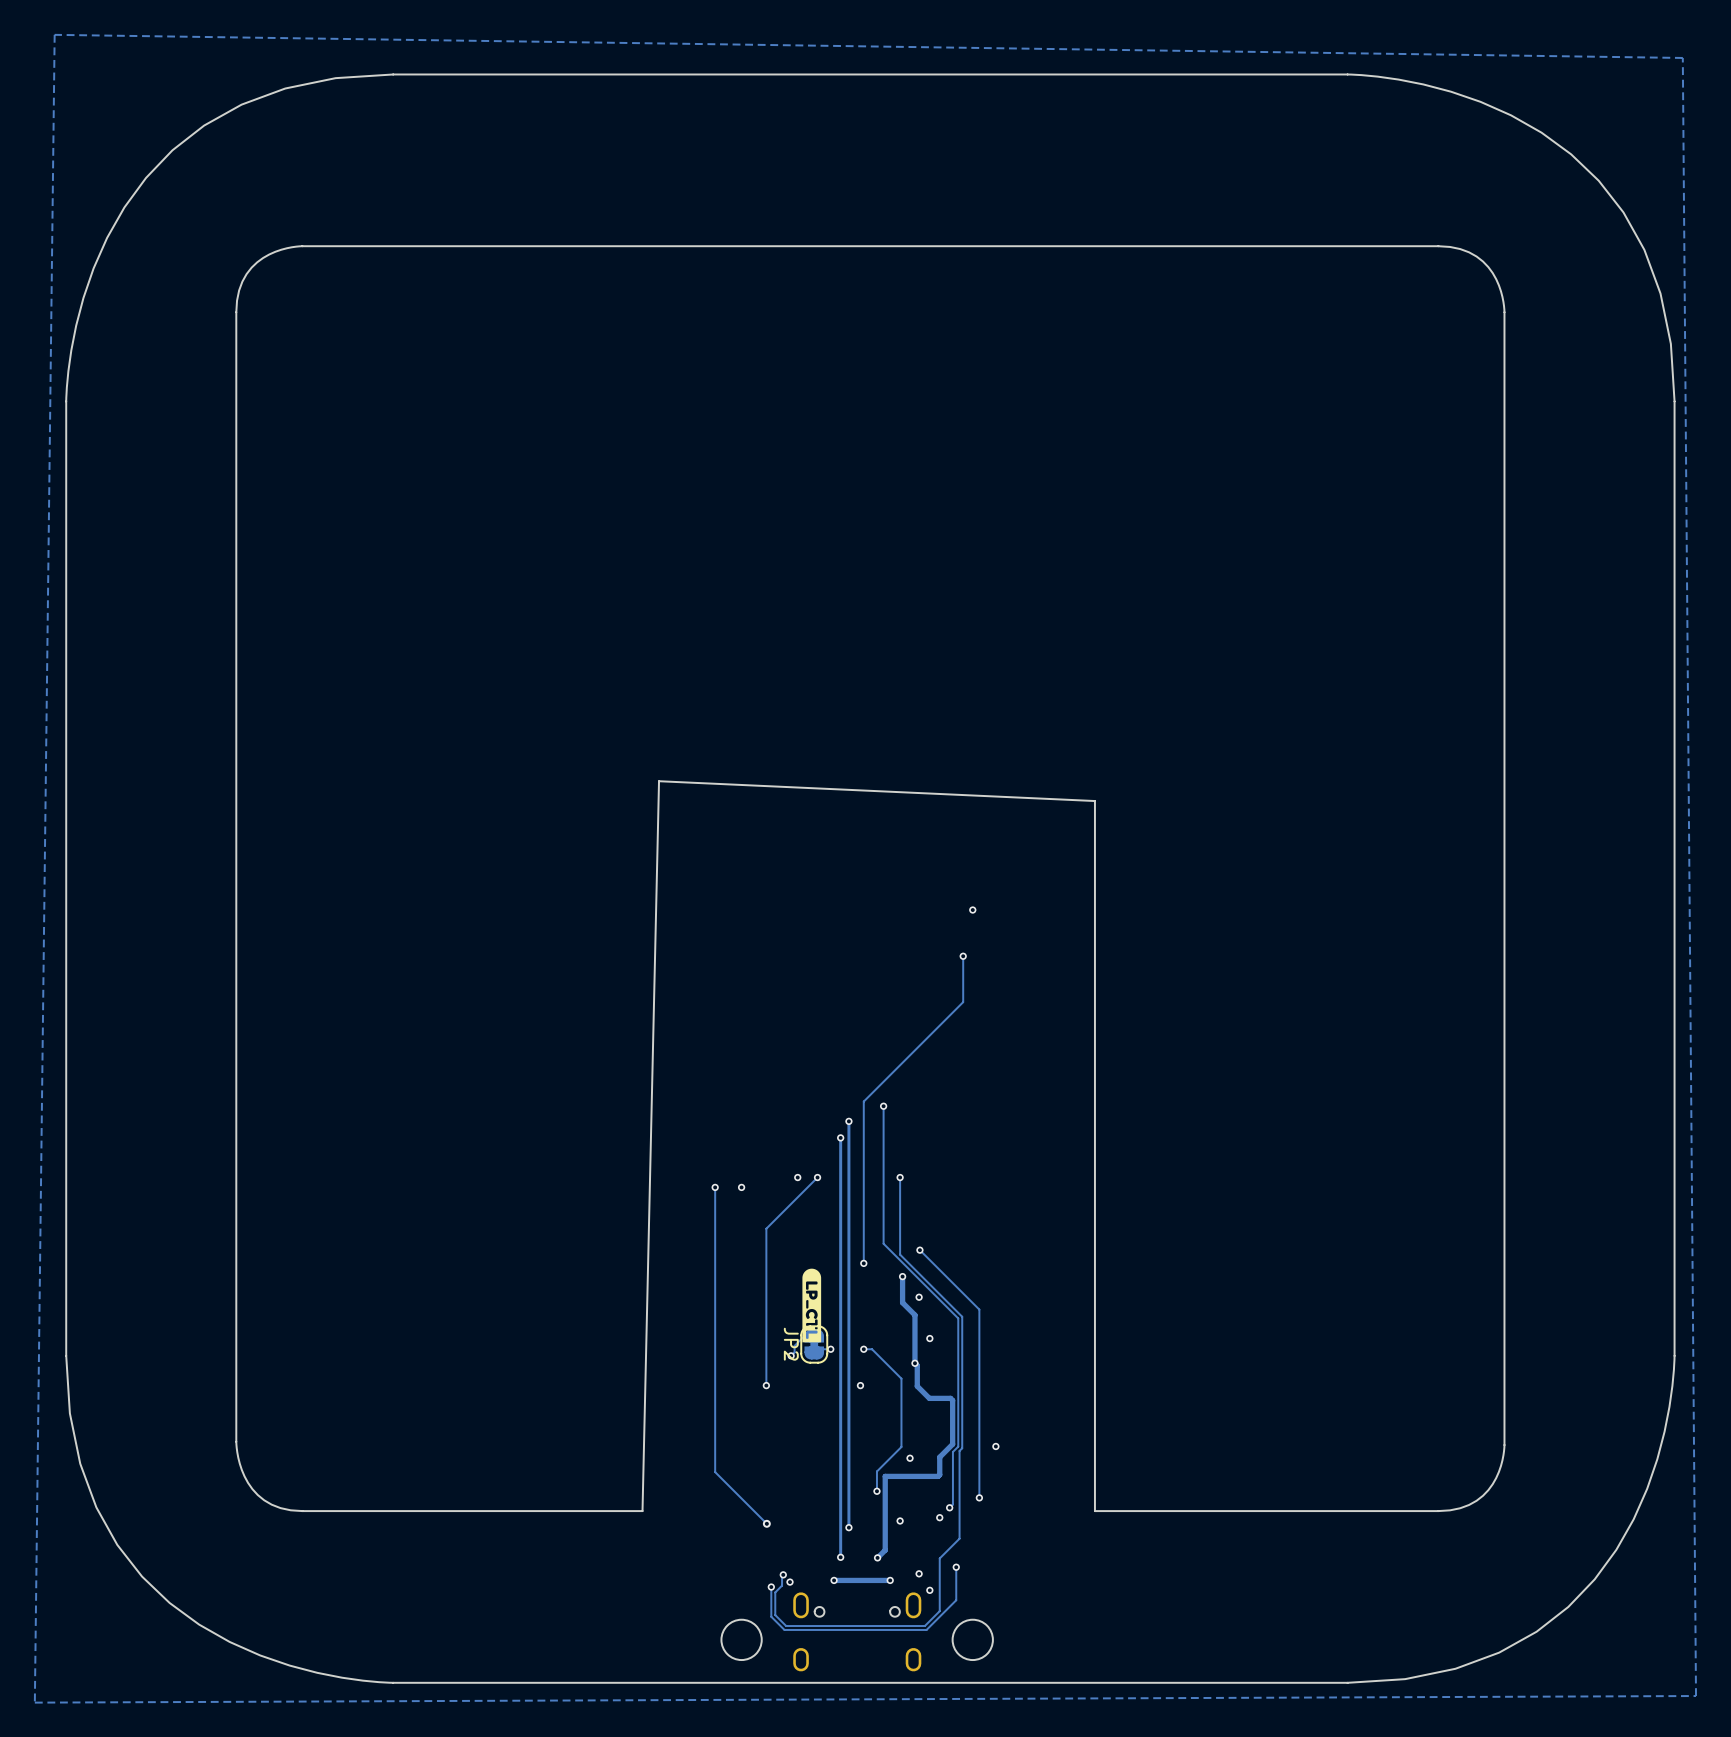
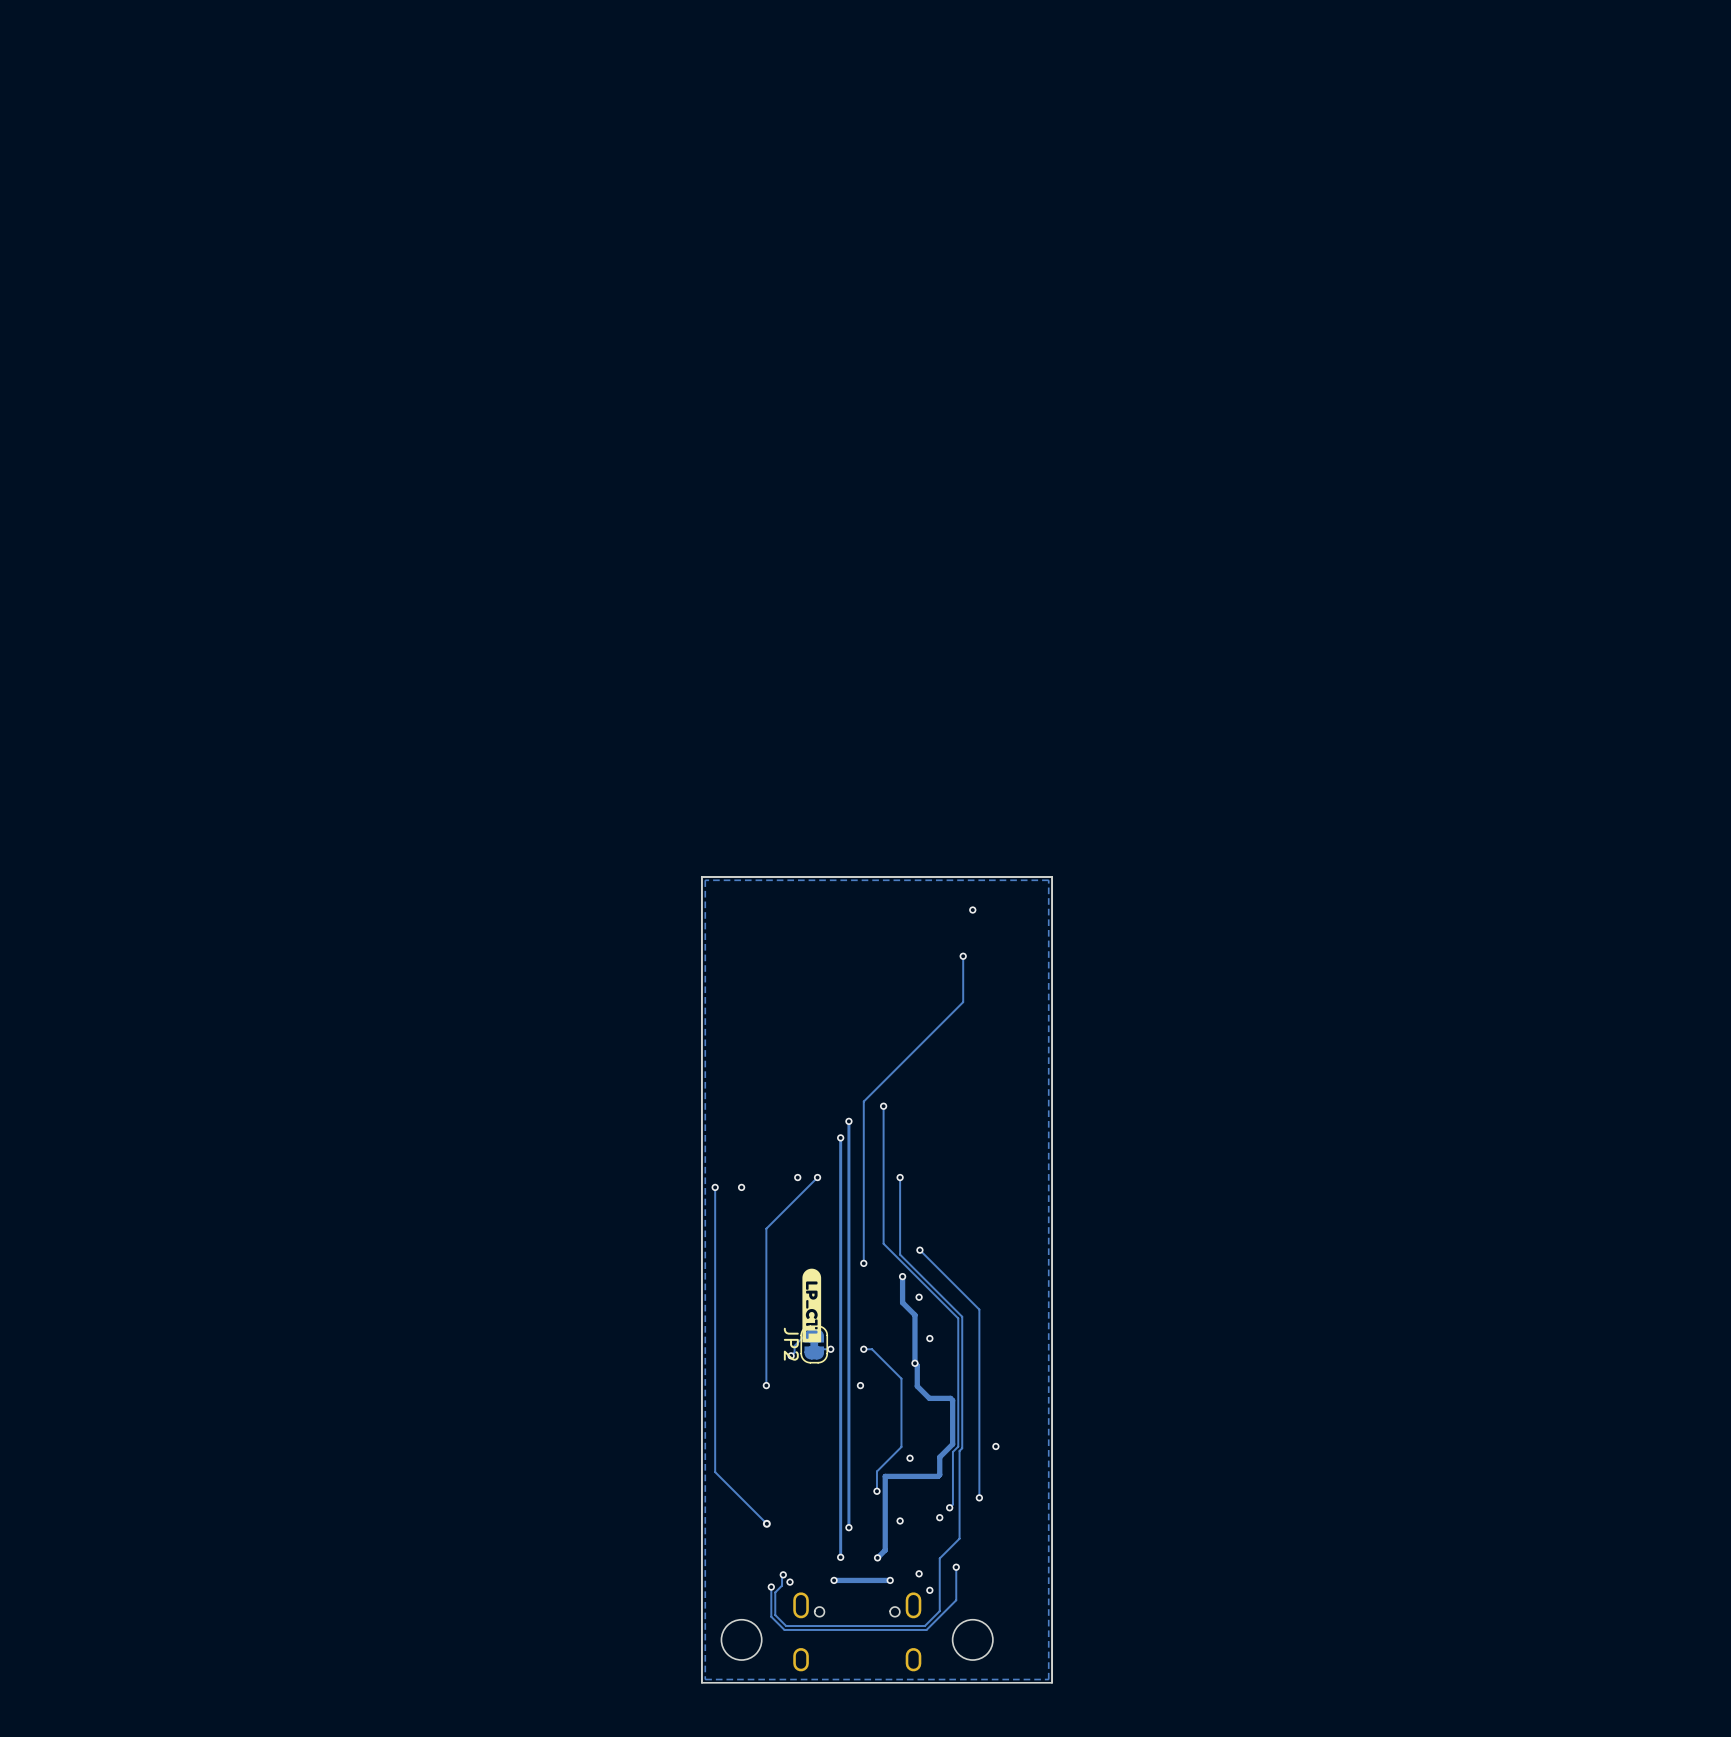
zone outline: (54, 34) (1682, 57) (1696, 1696) (34, 1702) (54, 34) -> none
board edge: (1438, 246) (302, 246) (275, 251) (263, 257) (251, 267) (239, 290) (236, 312) (236, 1441) (241, 1469) (248, 1482) (257, 1494) (280, 1508) (302, 1511) (642, 1511) (659, 781) (1094, 801) (1094, 1511) (1438, 1511) (1450, 1510) (1469, 1504) (1488, 1490) (1498, 1471) (1504, 1445) (1504, 311) (1498, 285) (1492, 273) (1483, 261) (1460, 249) (1438, 246) -> none
zone outline: none -> (1048, 880) (1048, 1679) (705, 1679) (705, 880) (1048, 880)
board edge: (1052, 1682) (1347, 1682) (1405, 1679) (1455, 1668) (1499, 1652) (1536, 1631) (1568, 1606) (1594, 1579) (1616, 1549) (1633, 1519) (1647, 1488) (1664, 1431) (1672, 1386) (1674, 1359) (1674, 401) (1670, 343) (1660, 293) (1644, 249) (1623, 212) (1598, 180) (1571, 154) (1541, 132) (1511, 115) (1451, 91) (1423, 84) (1377, 76) (1347, 74) (393, 74) (335, 78) (285, 88) (241, 104) (204, 125) (172, 150) (146, 177) (124, 207) (107, 237) (93, 268) (83, 297) (71, 350) (66, 401) (66, 1355) (69, 1413) (80, 1463) (96, 1507) (117, 1544) (142, 1576) (169, 1602) (199, 1624) (229, 1641) (260, 1655) (317, 1672) (379, 1682) (701, 1682) -> (1052, 1682) (1052, 876) (701, 876) (701, 1682)

